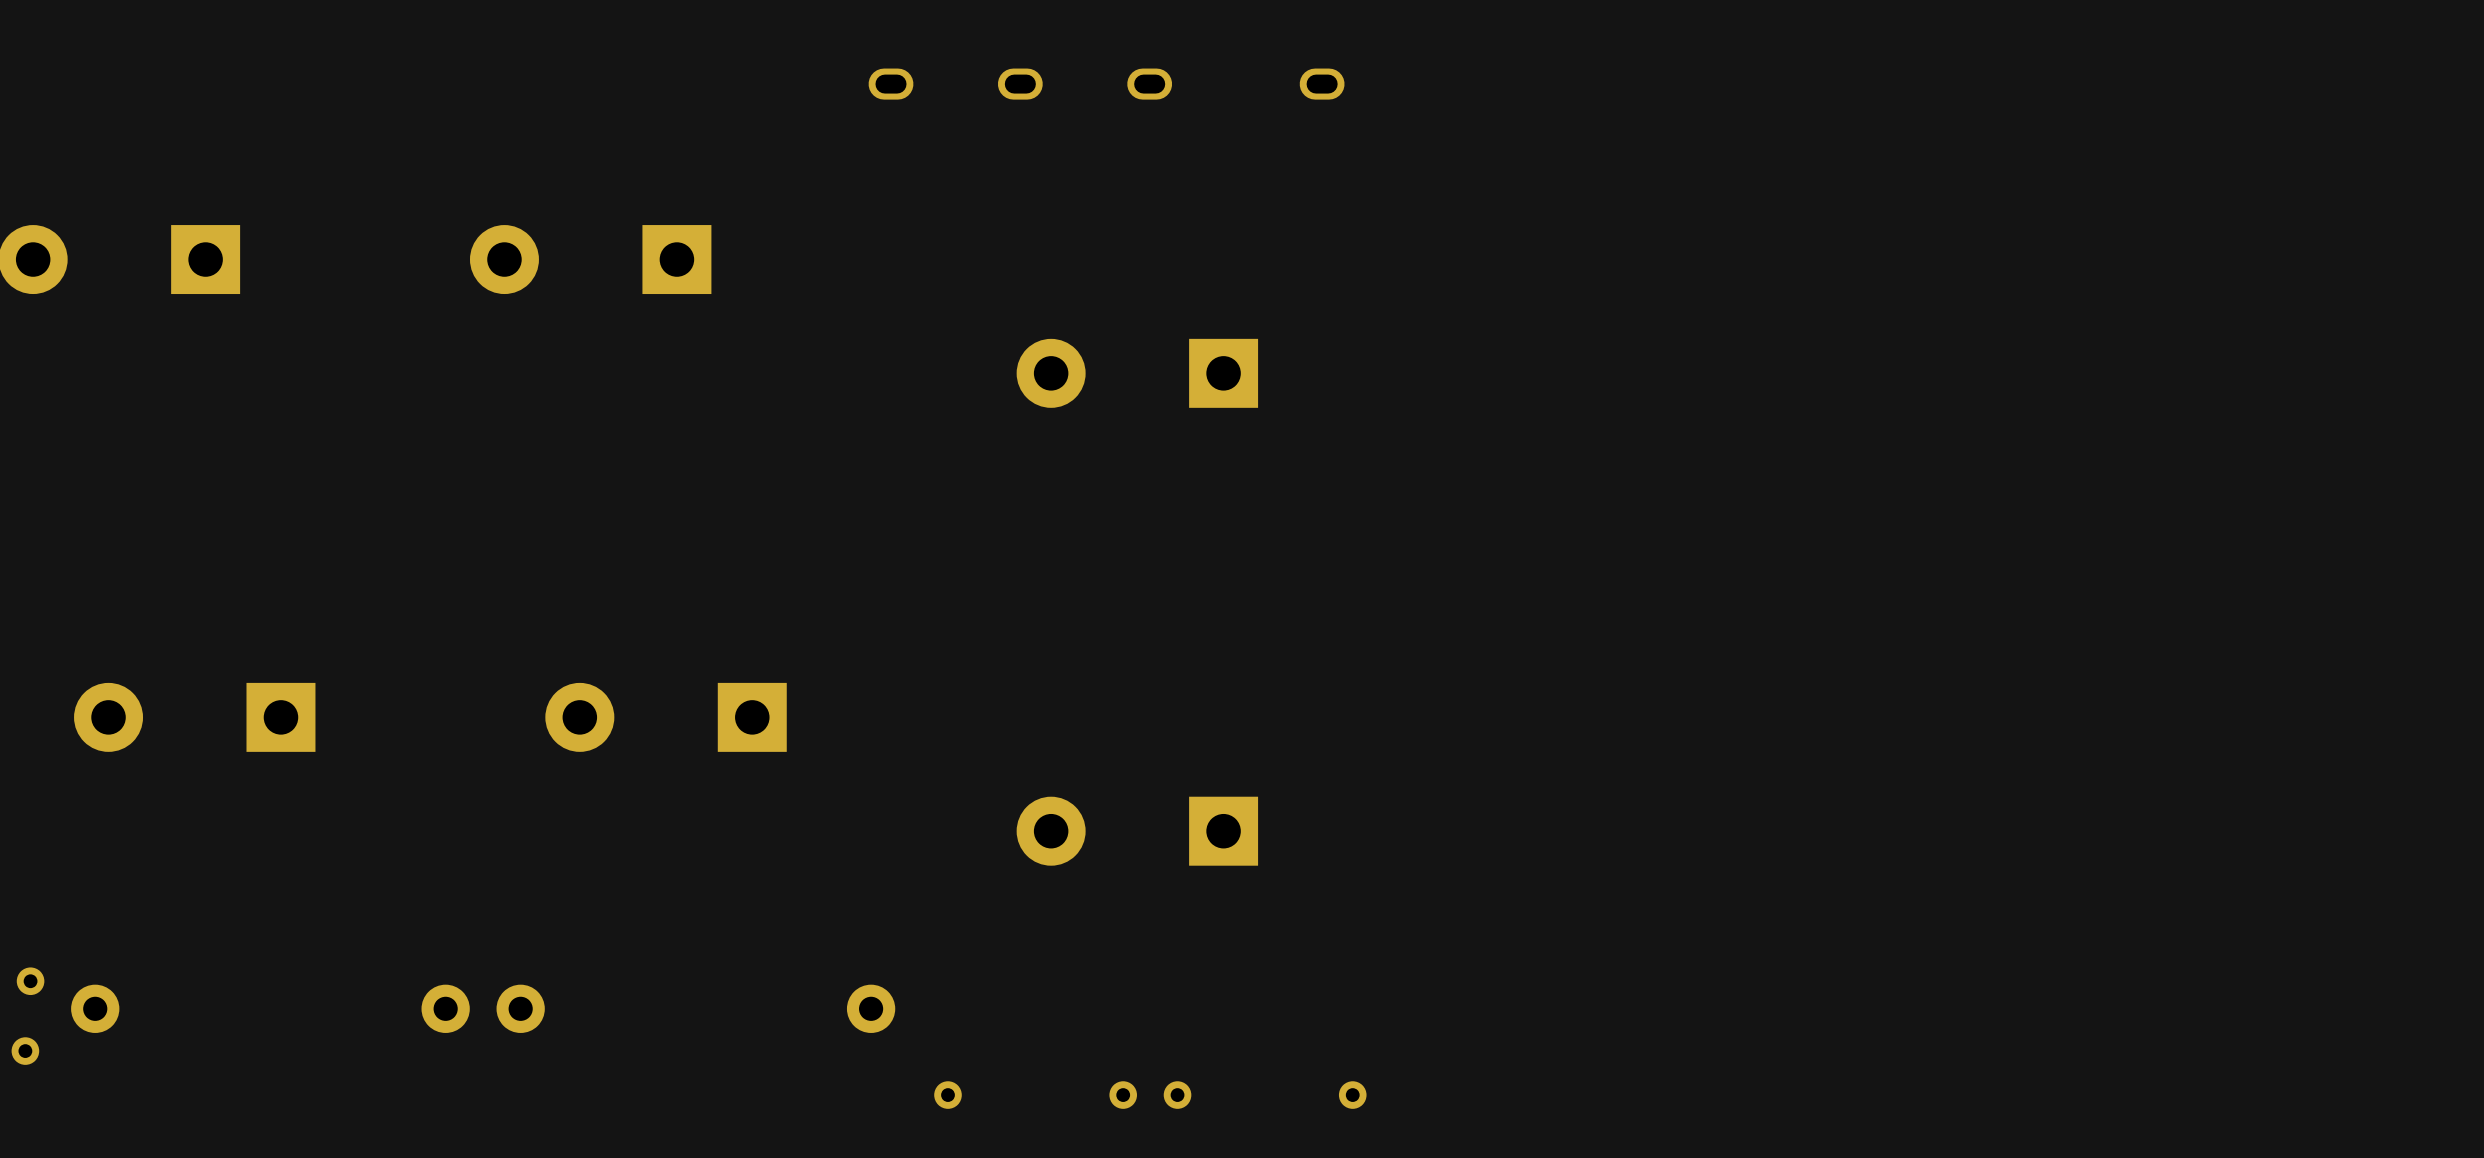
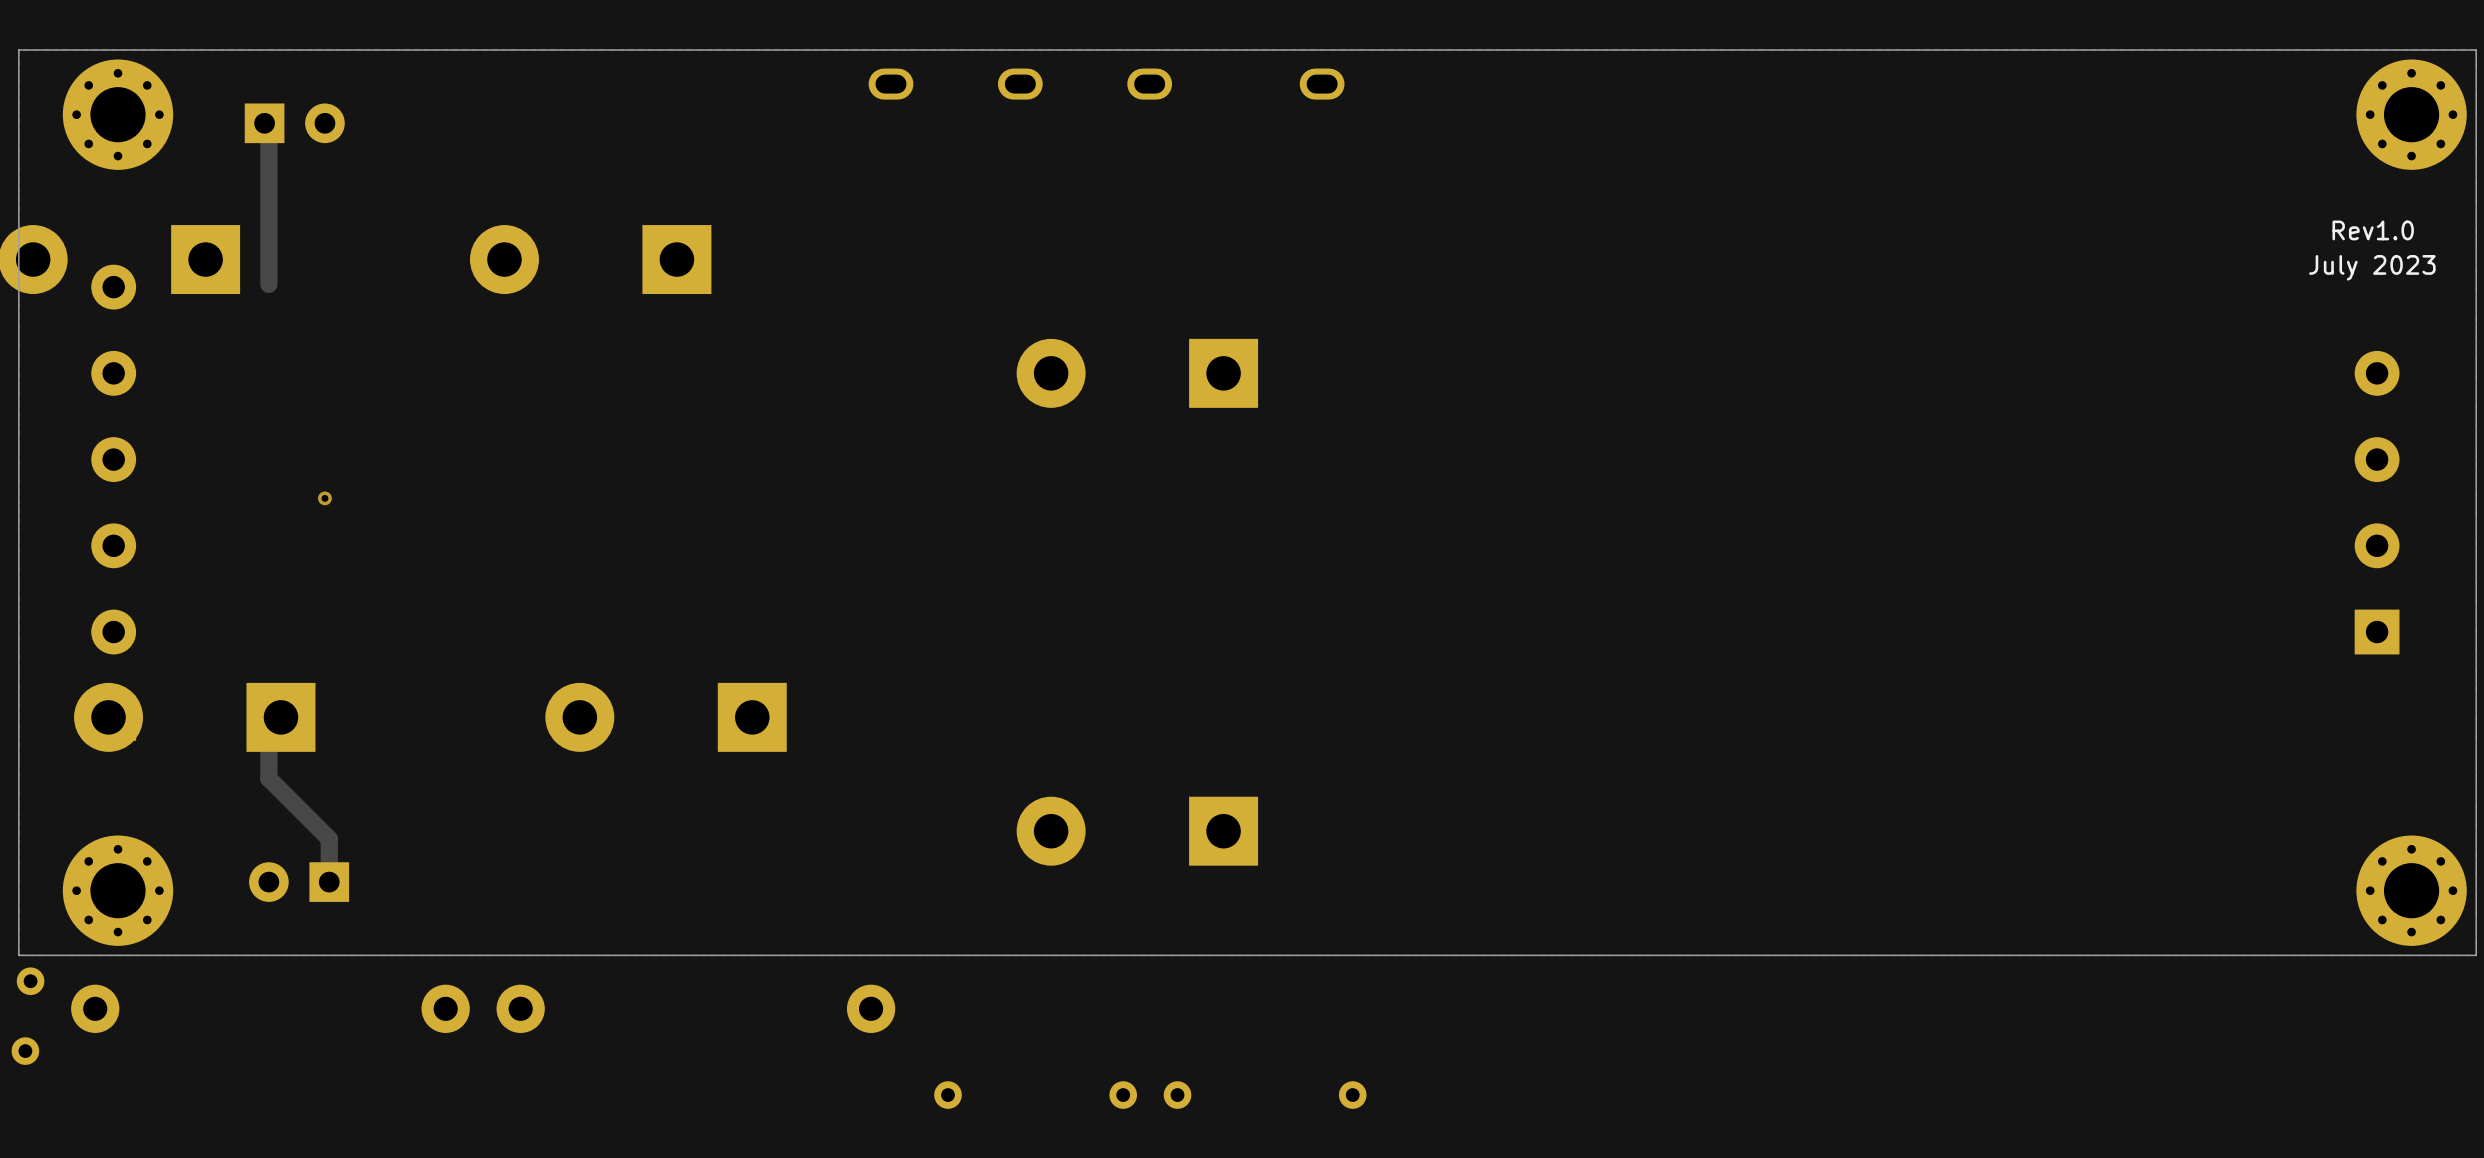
board edge: none -> (2476, 50) (2476, 955) (18, 955) (18, 50) (2476, 50)
part: none -> (118, 114)
part: none -> (2411, 114)
track: none -> (264, 123) (268, 127) (268, 284)
part: none -> (294, 123)
text: none -> Rev1.0 (2373, 230)
text: none -> July 2023 (2372, 267)
via: none -> (324, 498)
part: none -> (113, 502)
part: none -> (2377, 502)
track: none -> (268, 746) (268, 778) (329, 838) (329, 882)
part: none -> (299, 882)
part: none -> (118, 890)
part: none -> (2411, 890)

